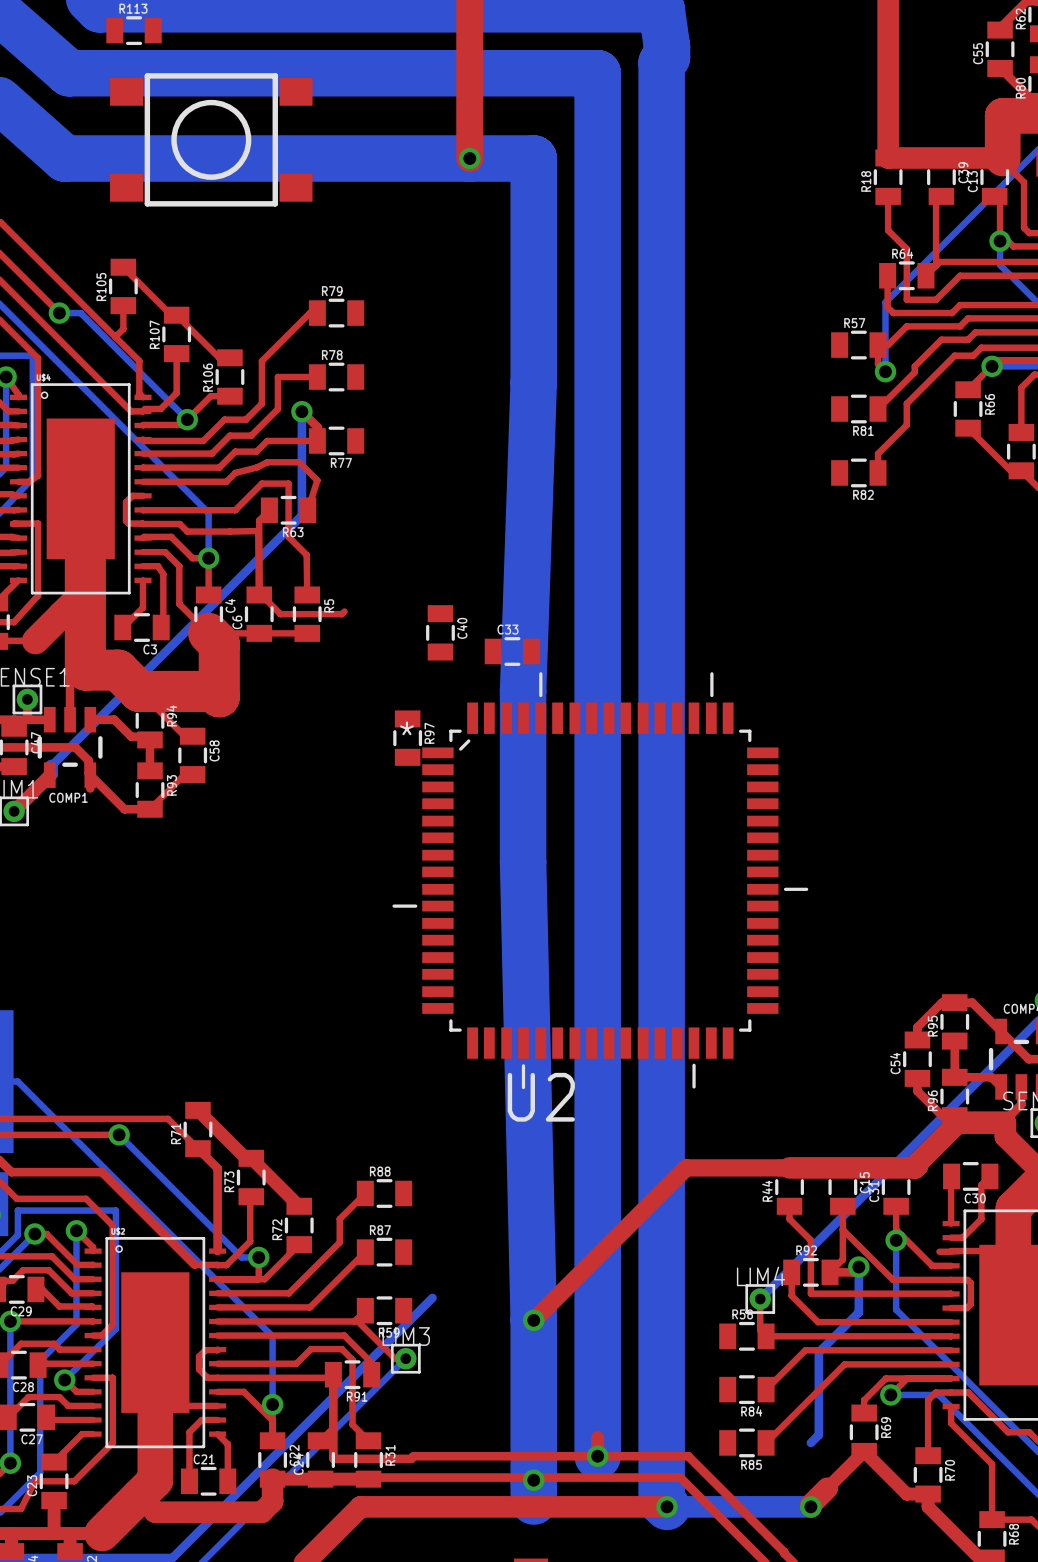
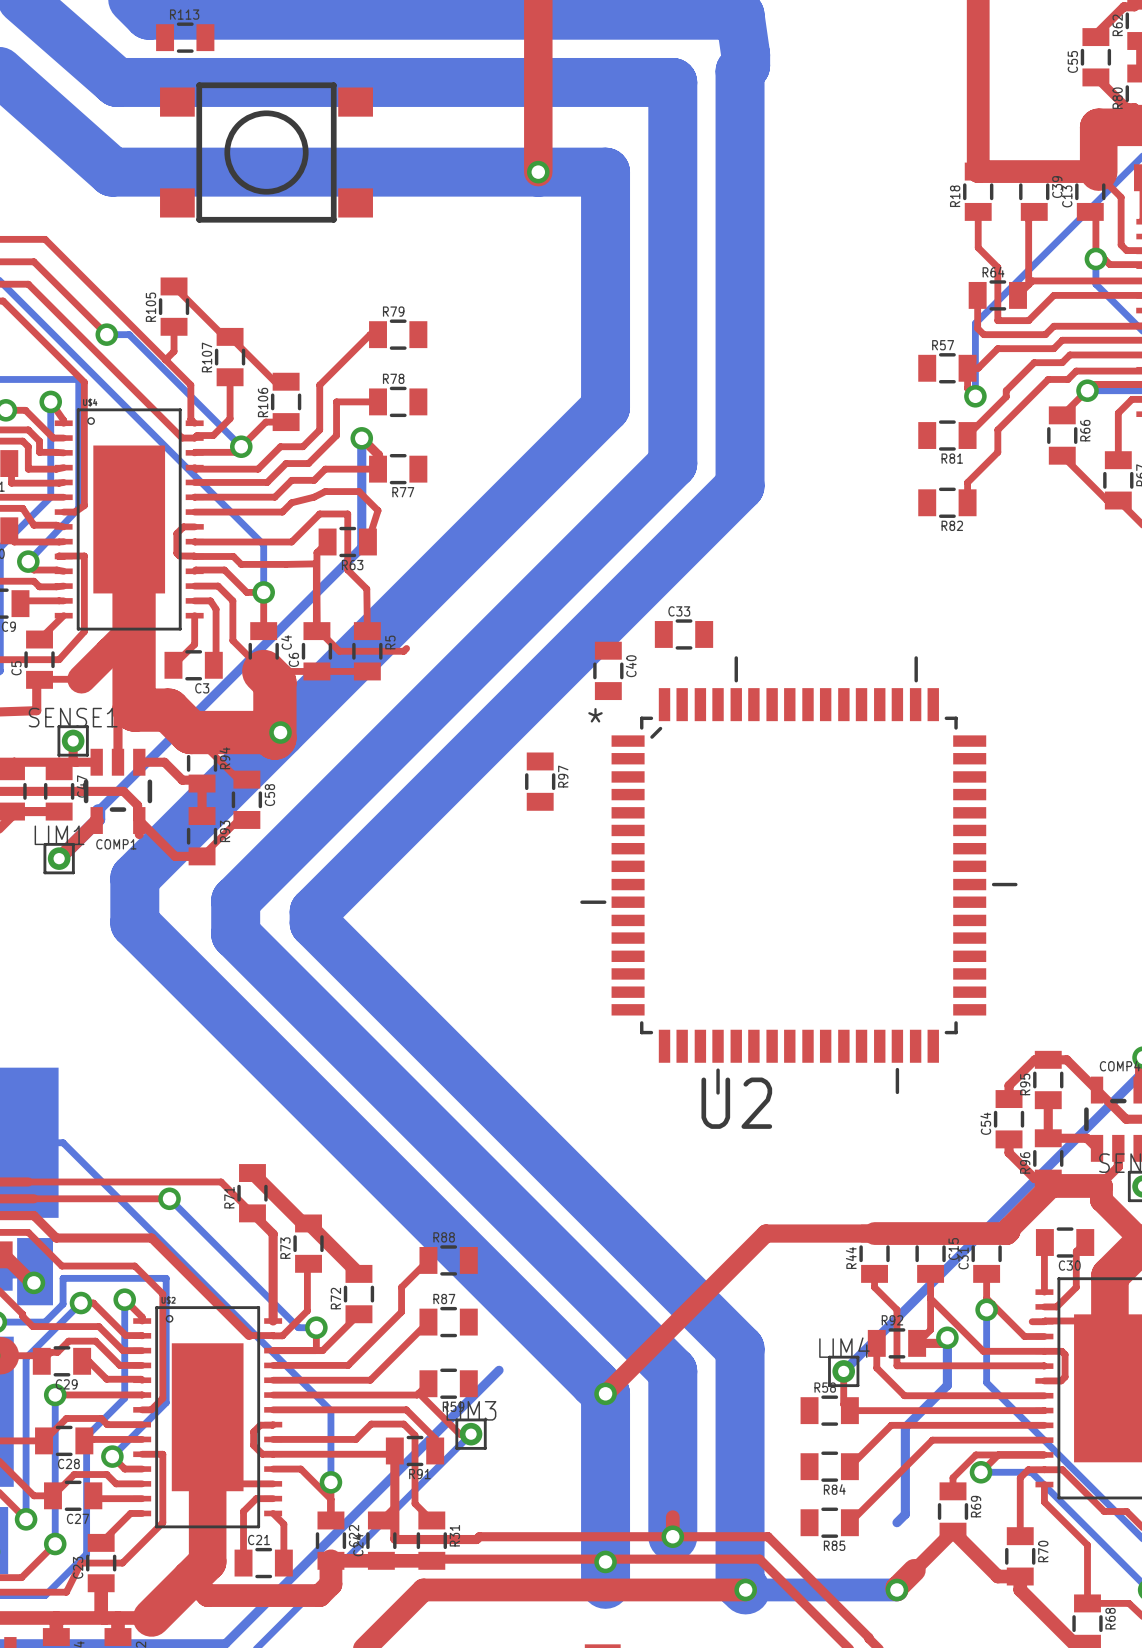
bottom track: (533, 382) (523, 691) (523, 862) (533, 1320) -> (605, 407) (134, 878) (134, 923) (605, 1393)
bottom track: (597, 435) (597, 1299) -> (672, 463) (235, 900) (235, 934) (672, 1371)
bottom track: (661, 456) (661, 1277) -> (740, 485) (314, 911) (314, 923) (740, 1348)
C40 position: (440, 632) -> (608, 670)
C33 position: (512, 651) -> (684, 634)
via: none -> (280, 732)
R97 position: (407, 738) -> (540, 781)
U2 position: (600, 880) -> (798, 875)

